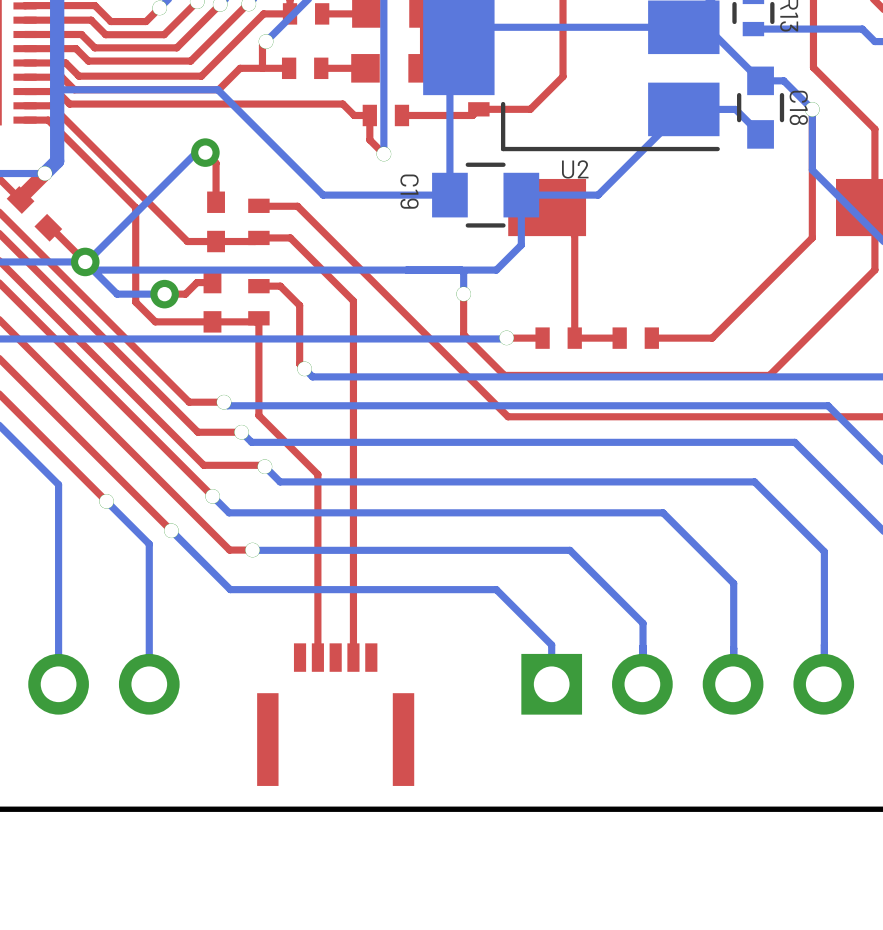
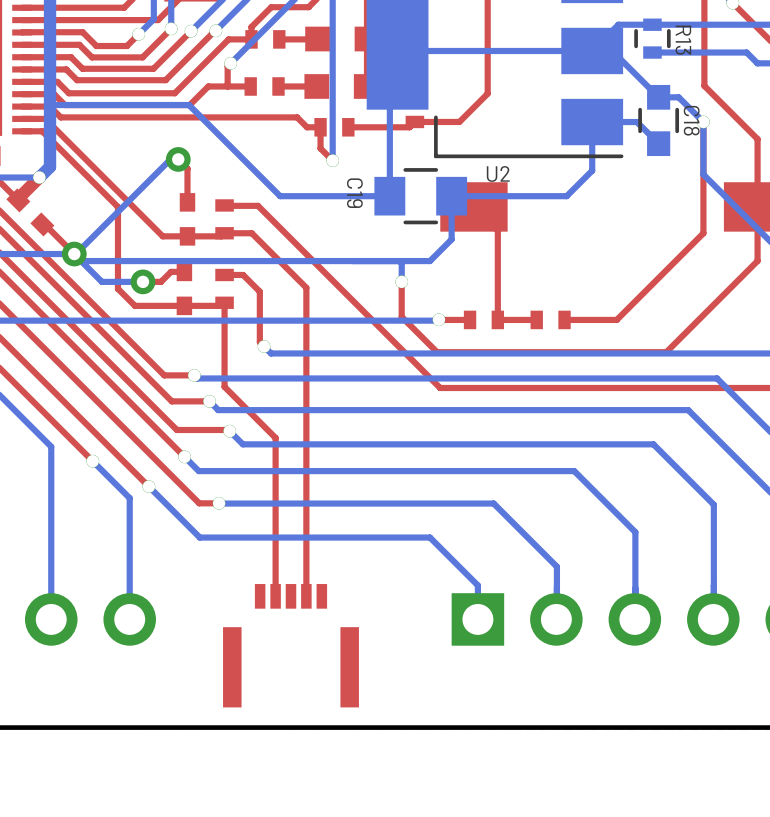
bottom track: (683, 109) (598, 195) -> (592, 122) (592, 170) (566, 196) (518, 196)

